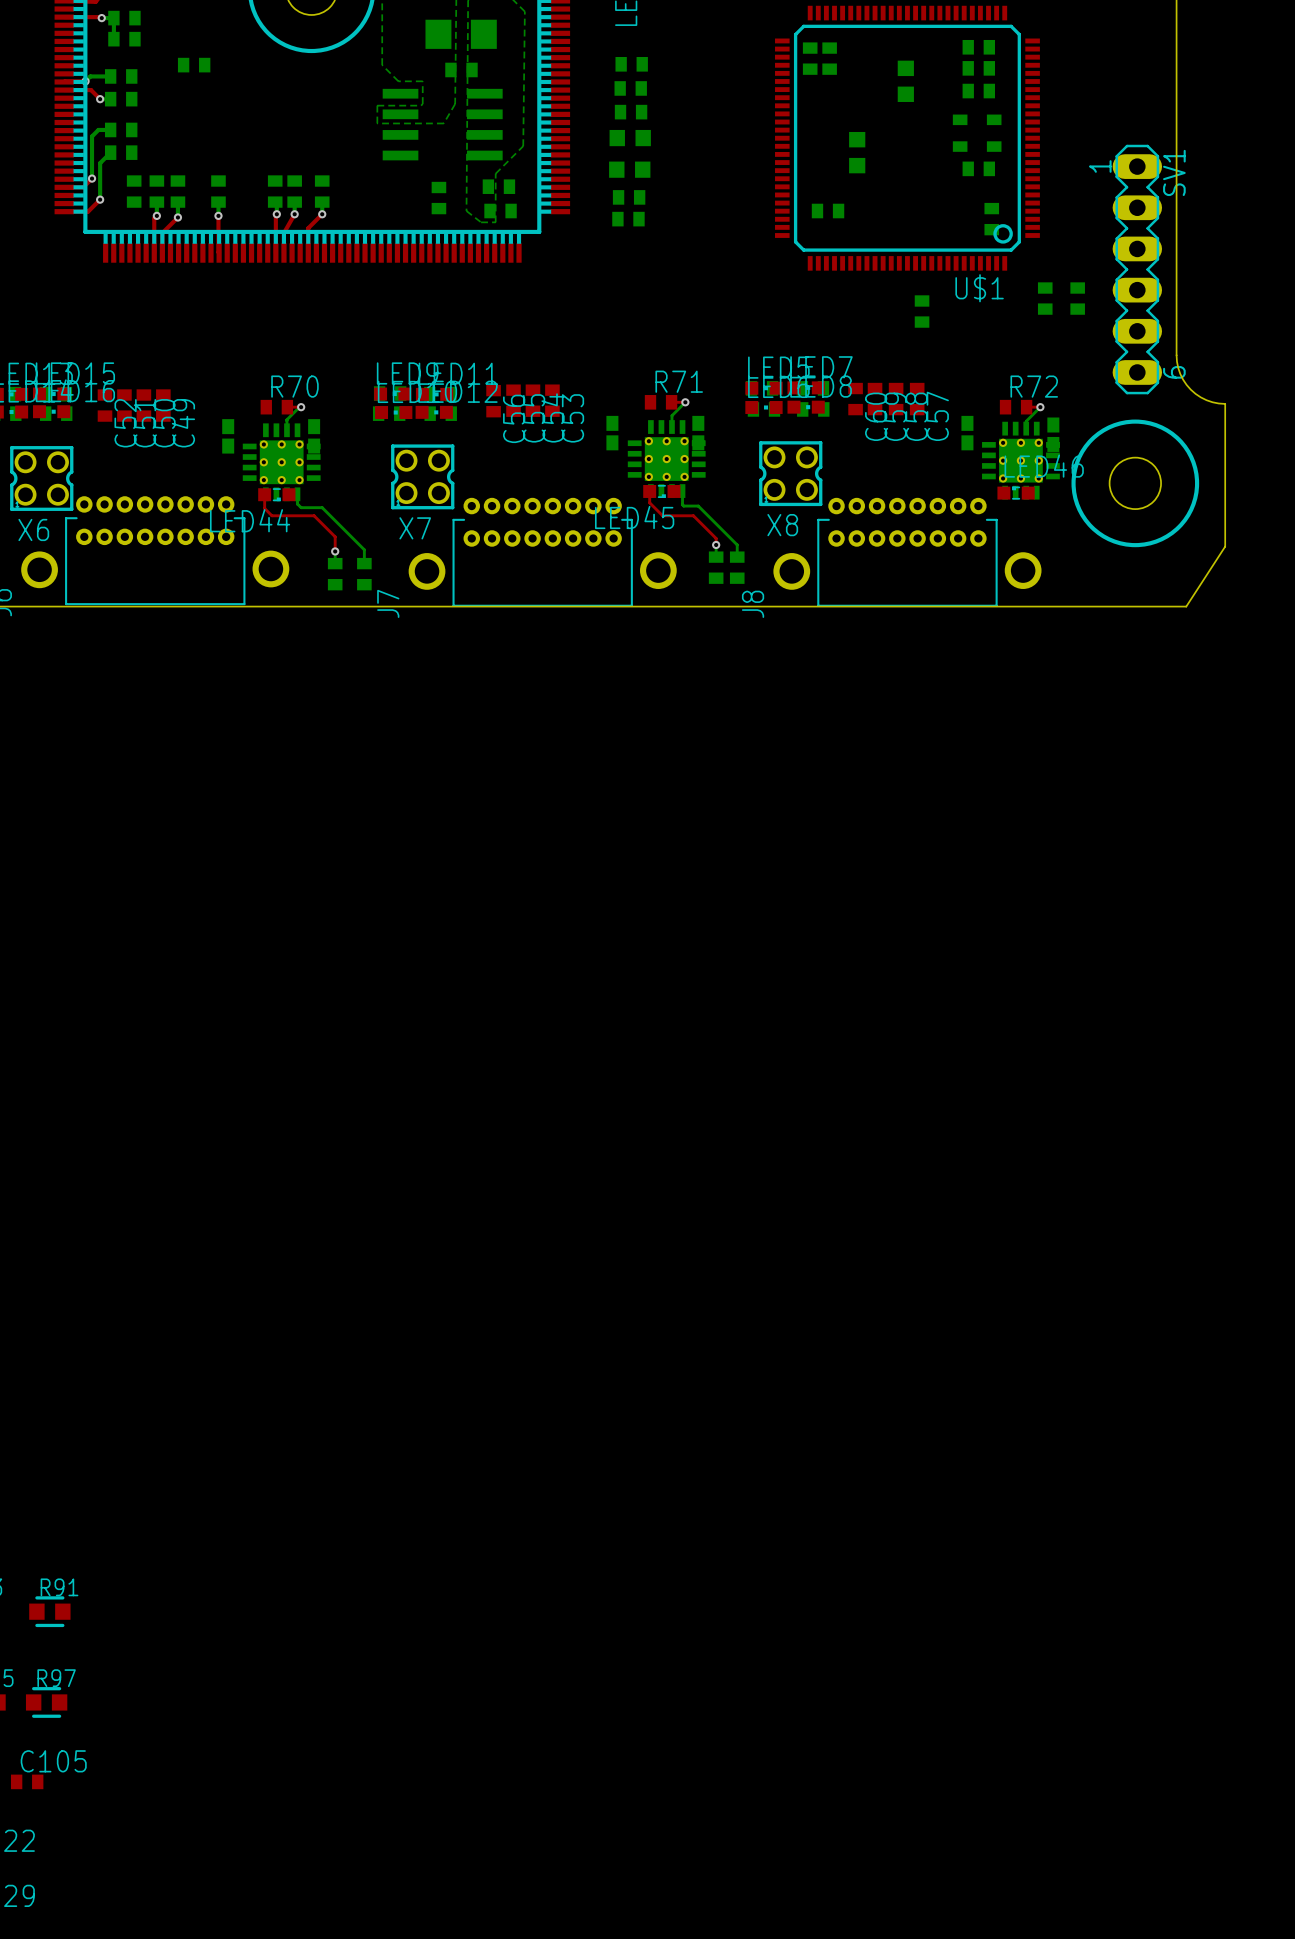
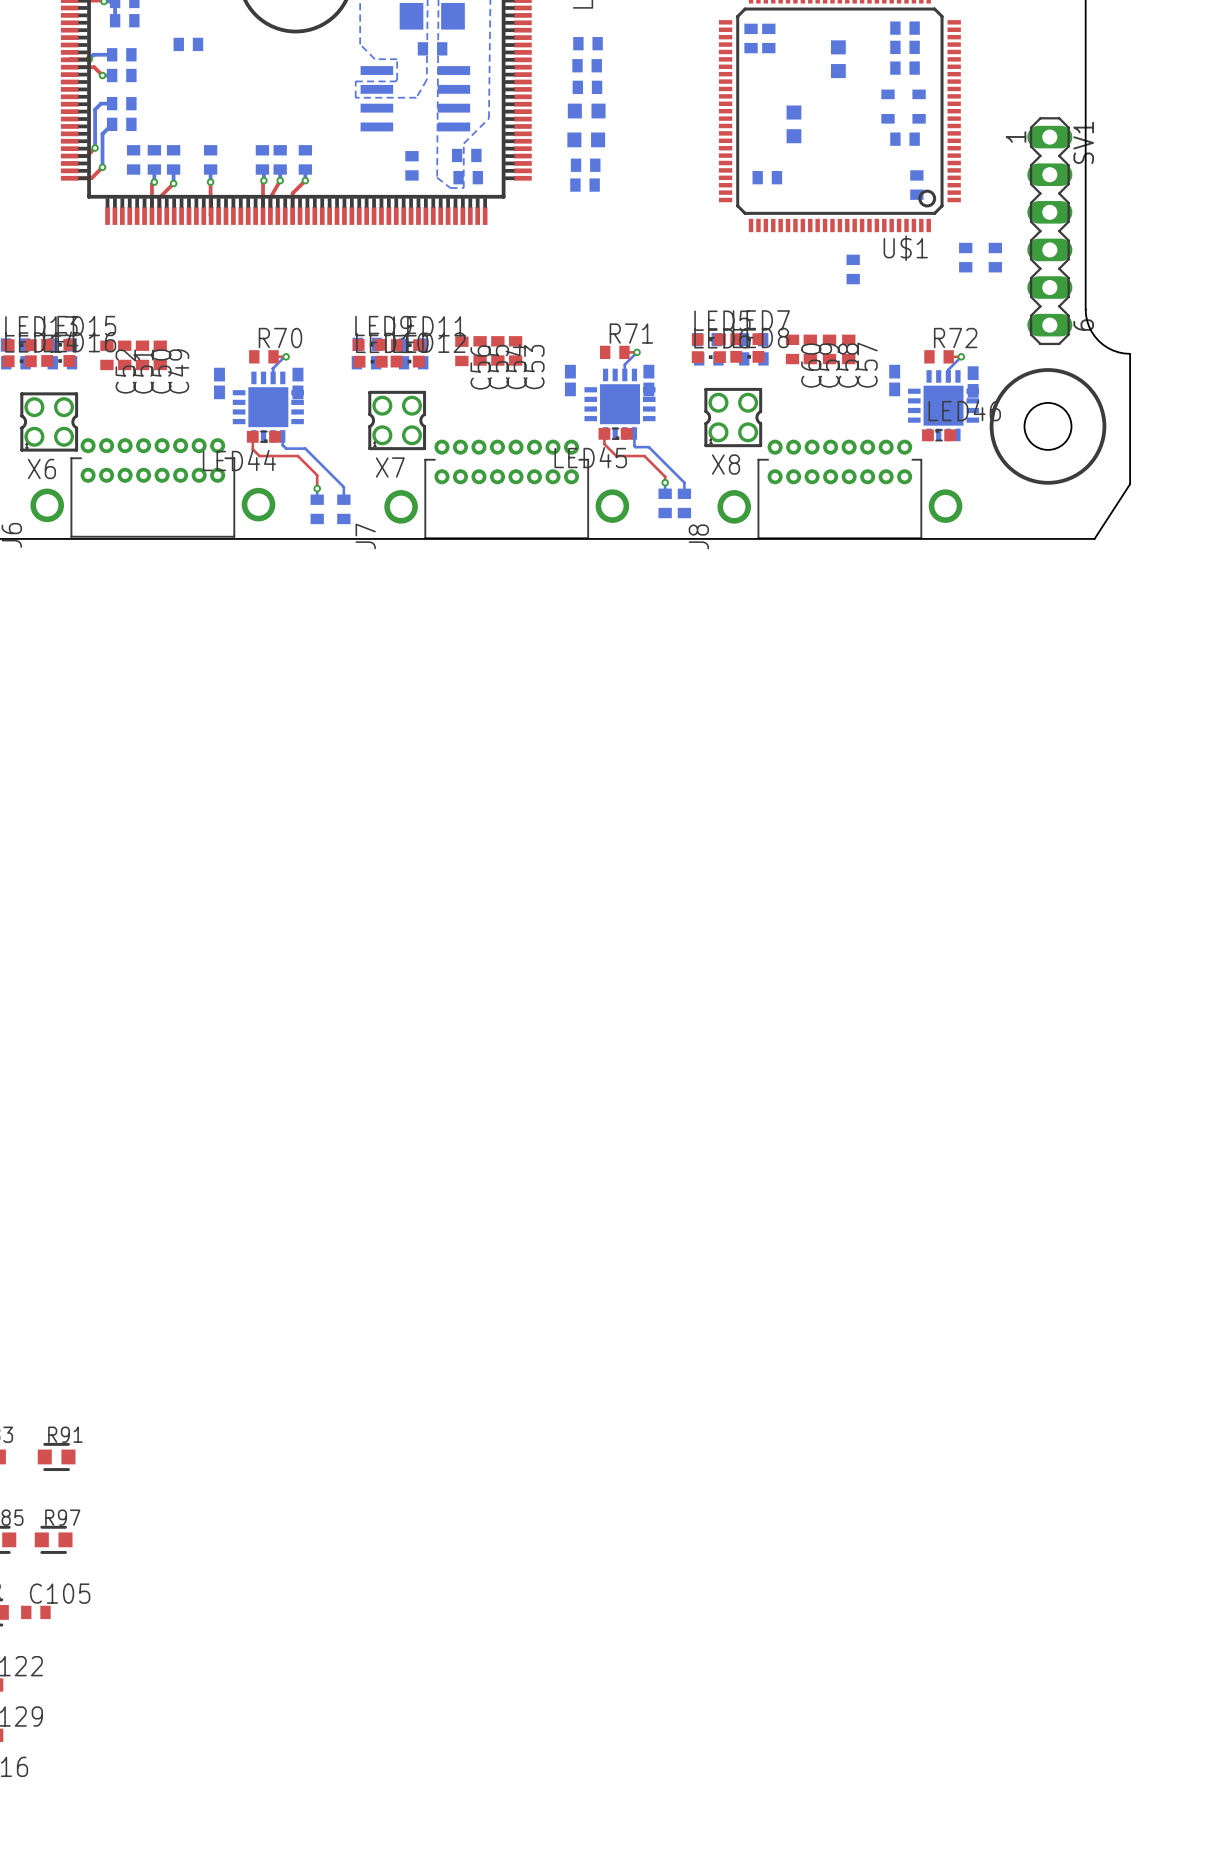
part footprint: [627, 420, 706, 498] -> [584, 368, 656, 440]
part footprint: [982, 421, 1060, 500] -> [907, 370, 980, 442]
part footprint: [242, 423, 321, 502] -> [232, 371, 304, 443]

